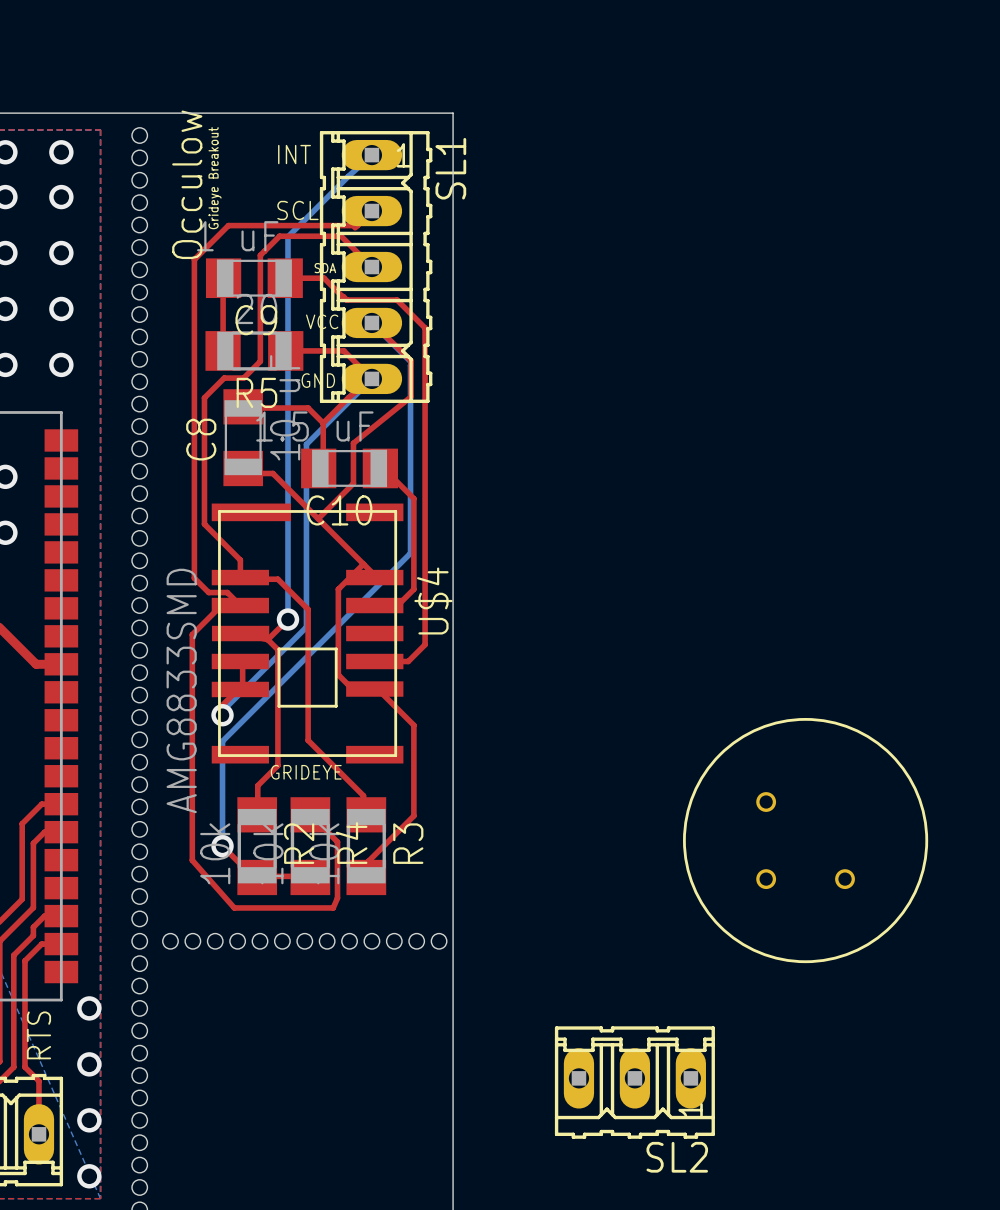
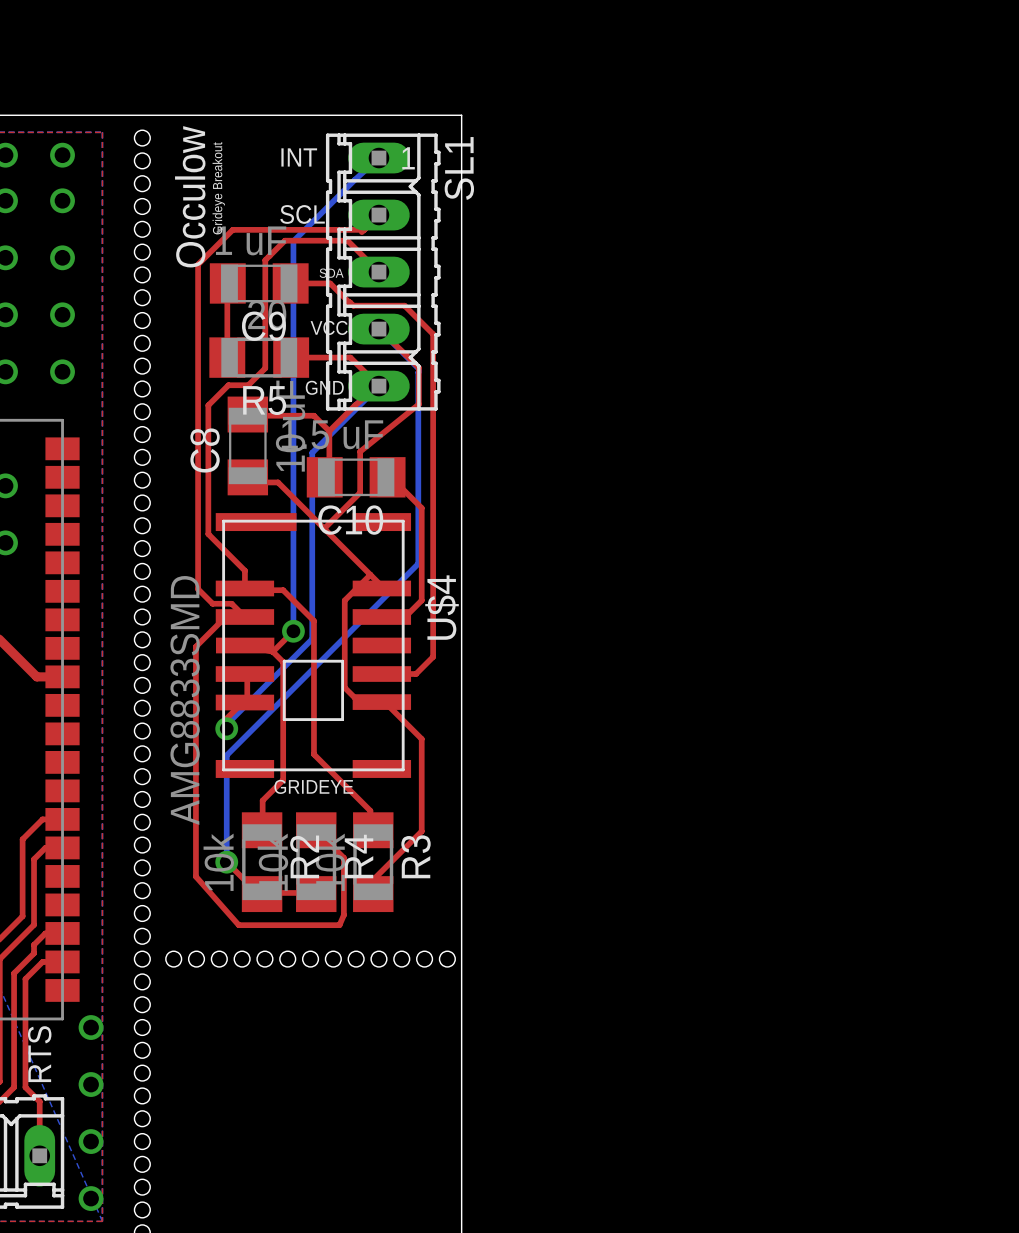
part: (805, 840) -> none
SL2: (634, 1082) -> none

